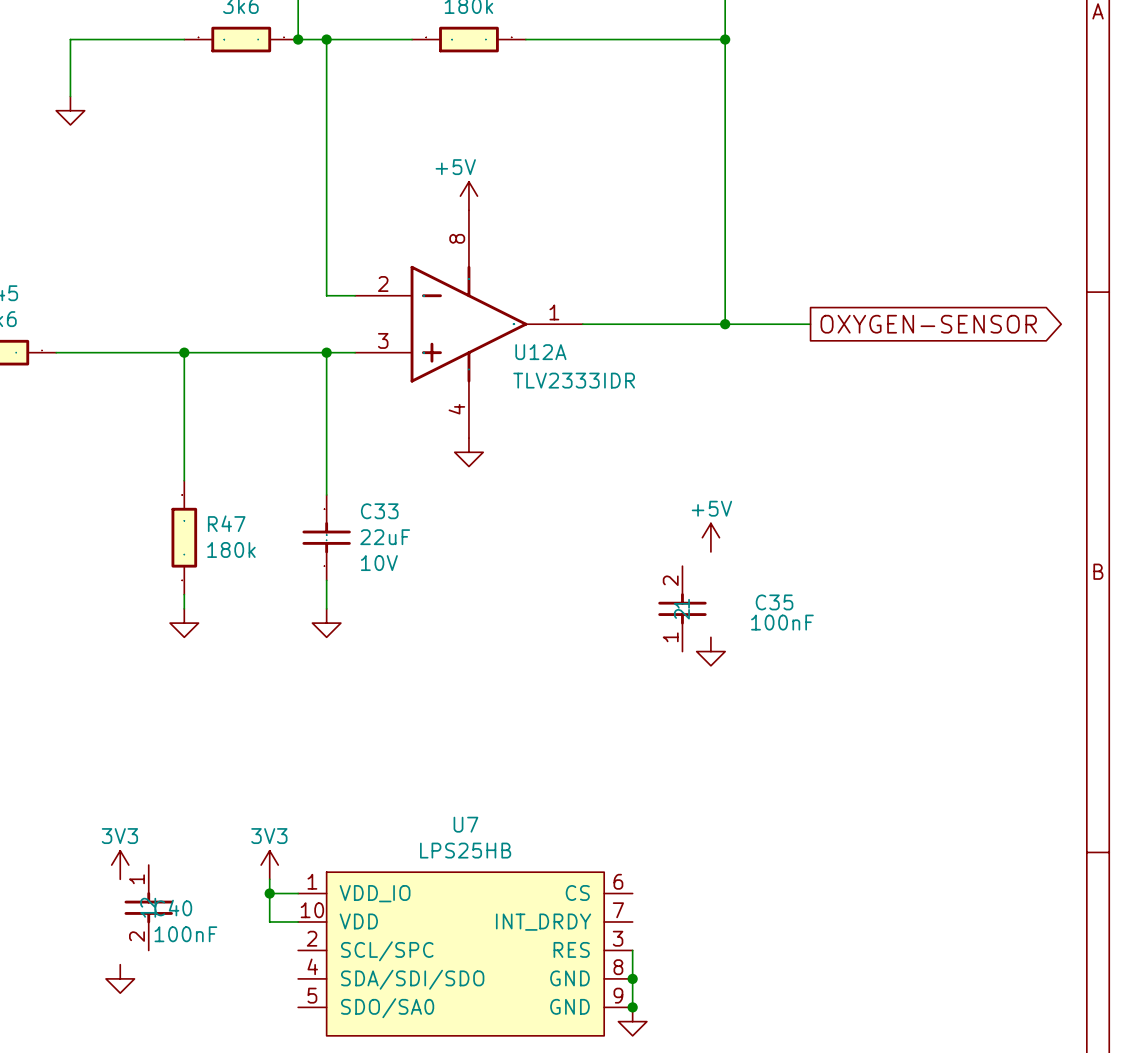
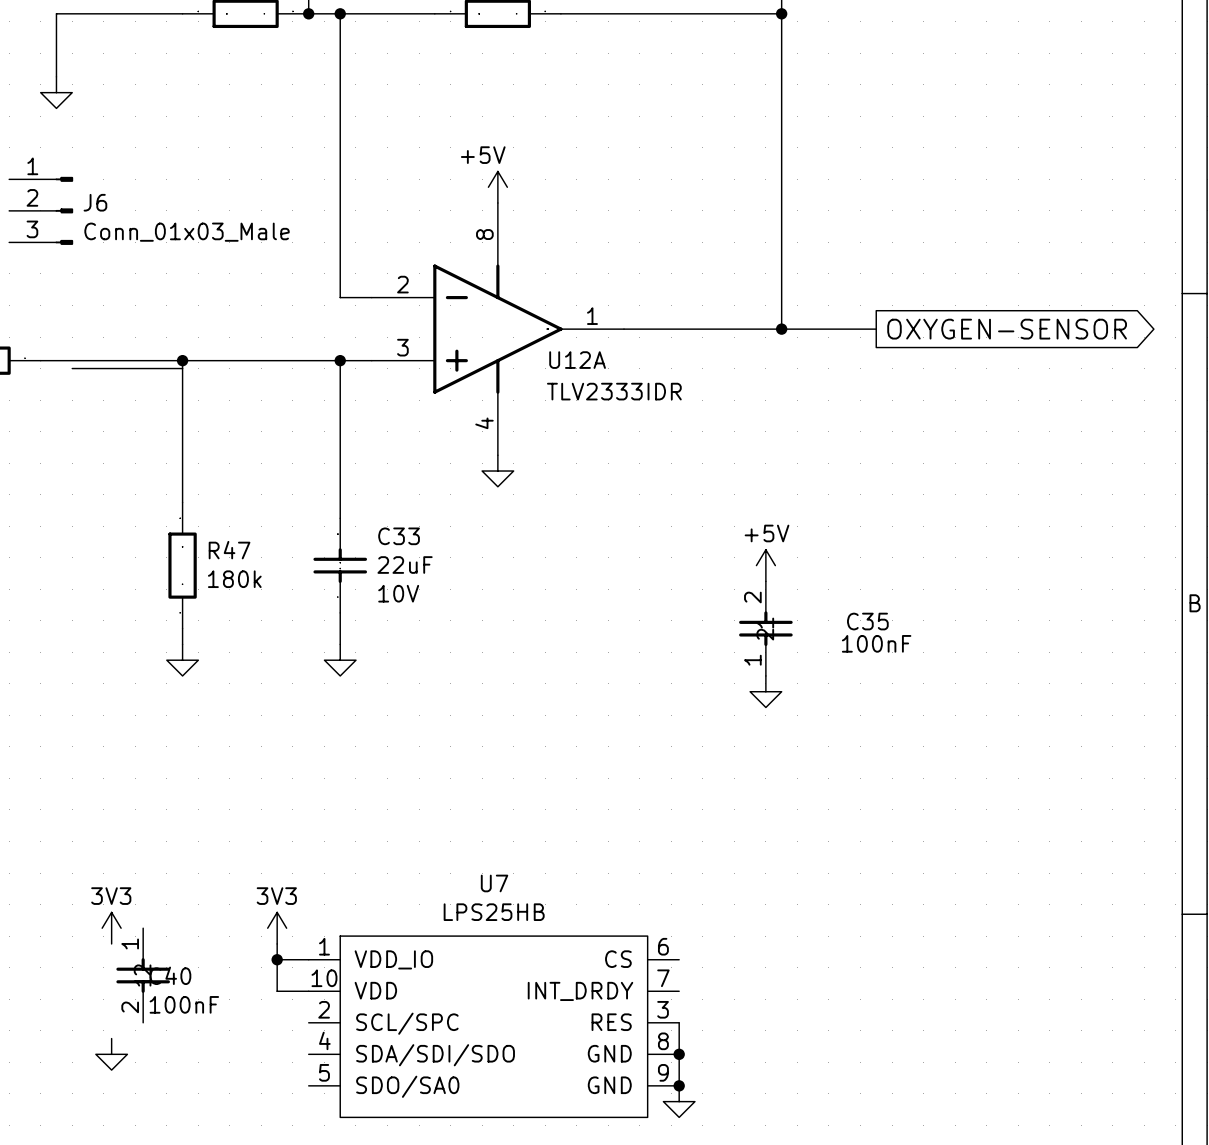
J6: none -> Conn_01x03_Male (41, 210)
wire: none -> (72, 368) (182, 368)
C35 position: (682, 608) -> (765, 628)

